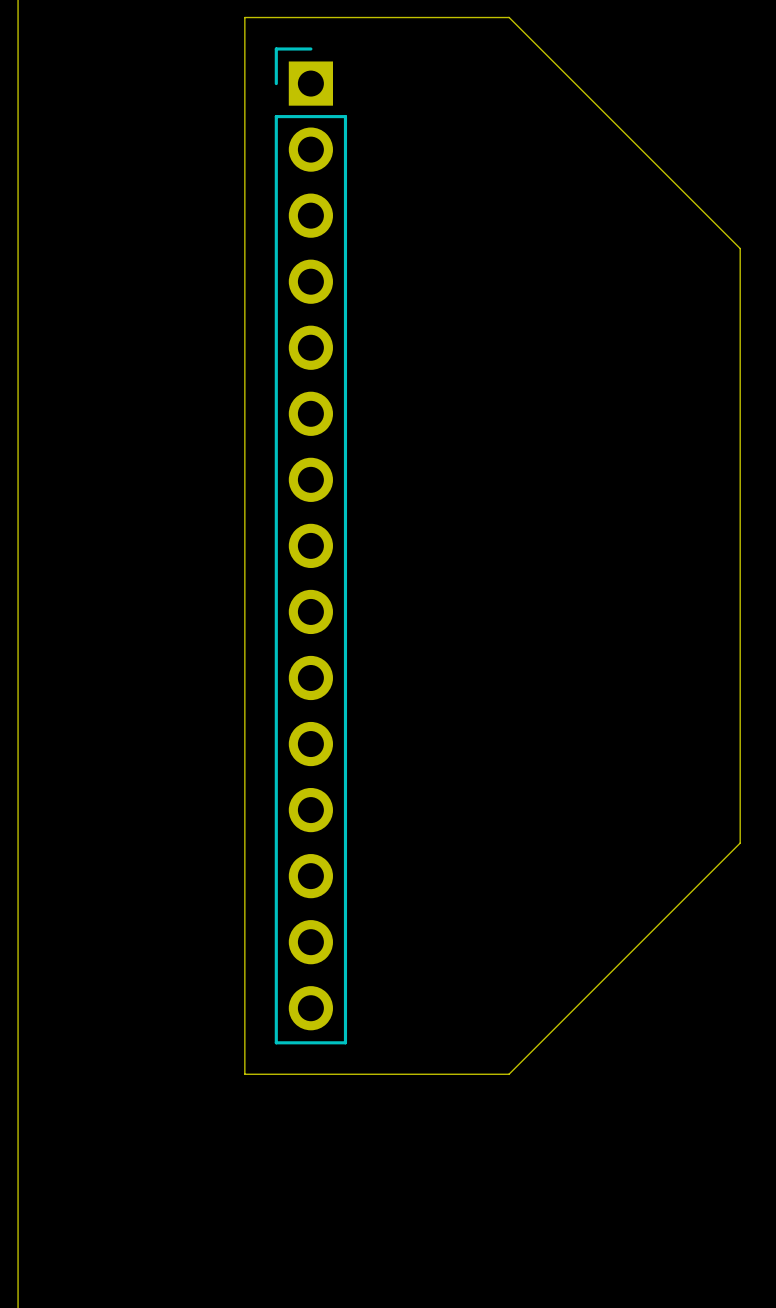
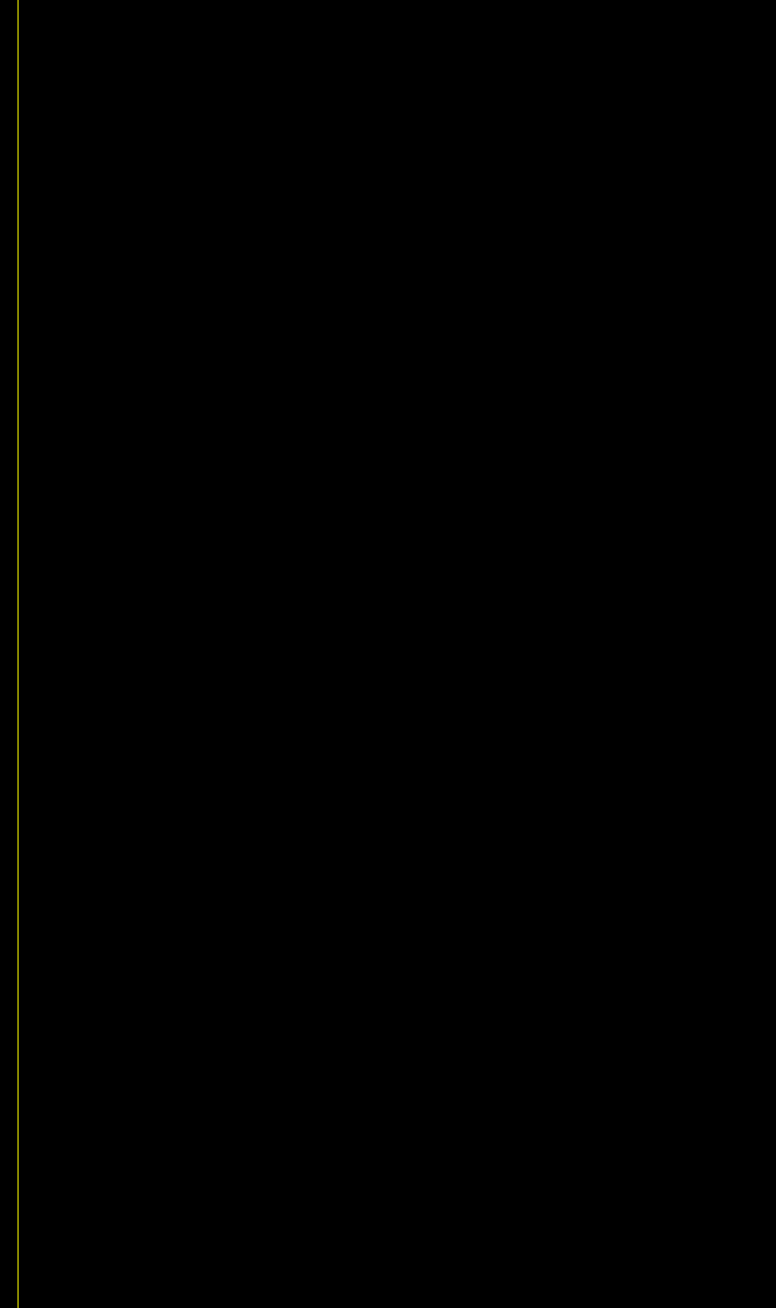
board edge: (509, 17) (740, 248) (740, 843) (509, 1074) (244, 1074) (244, 17) (509, 17) -> none
part: (310, 545) -> none

